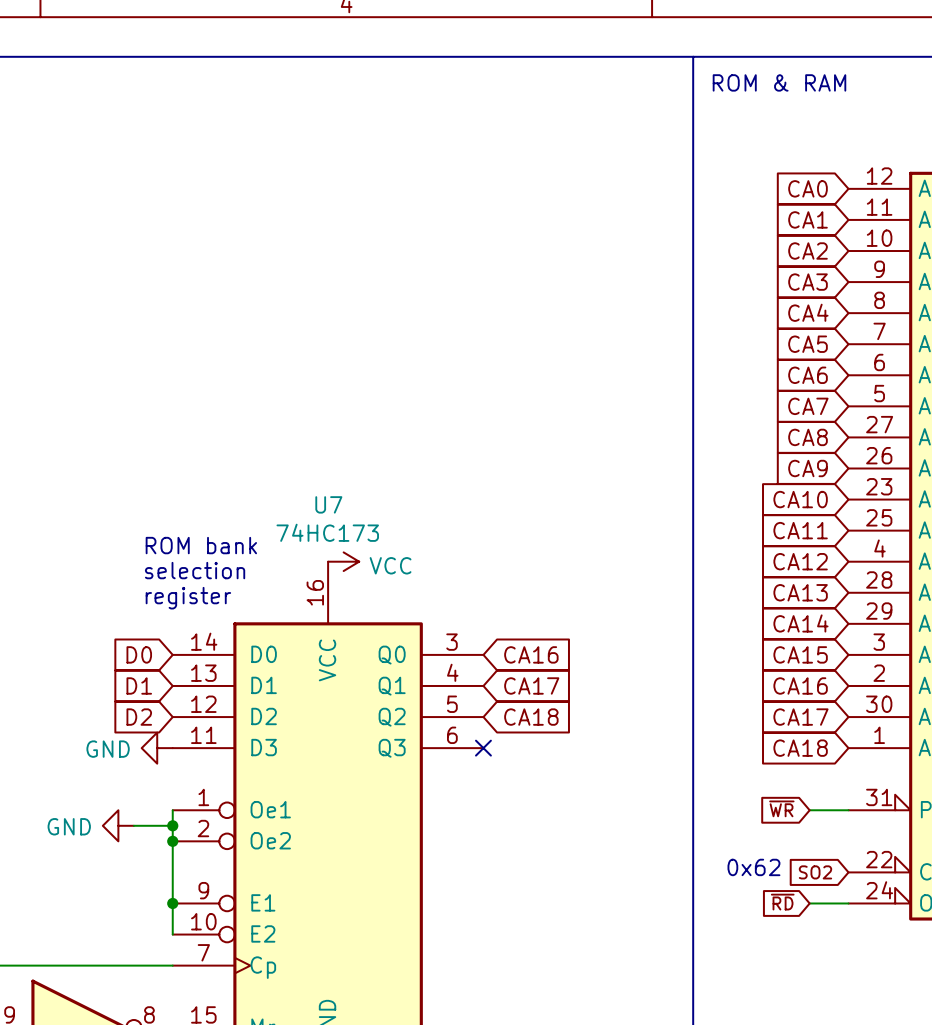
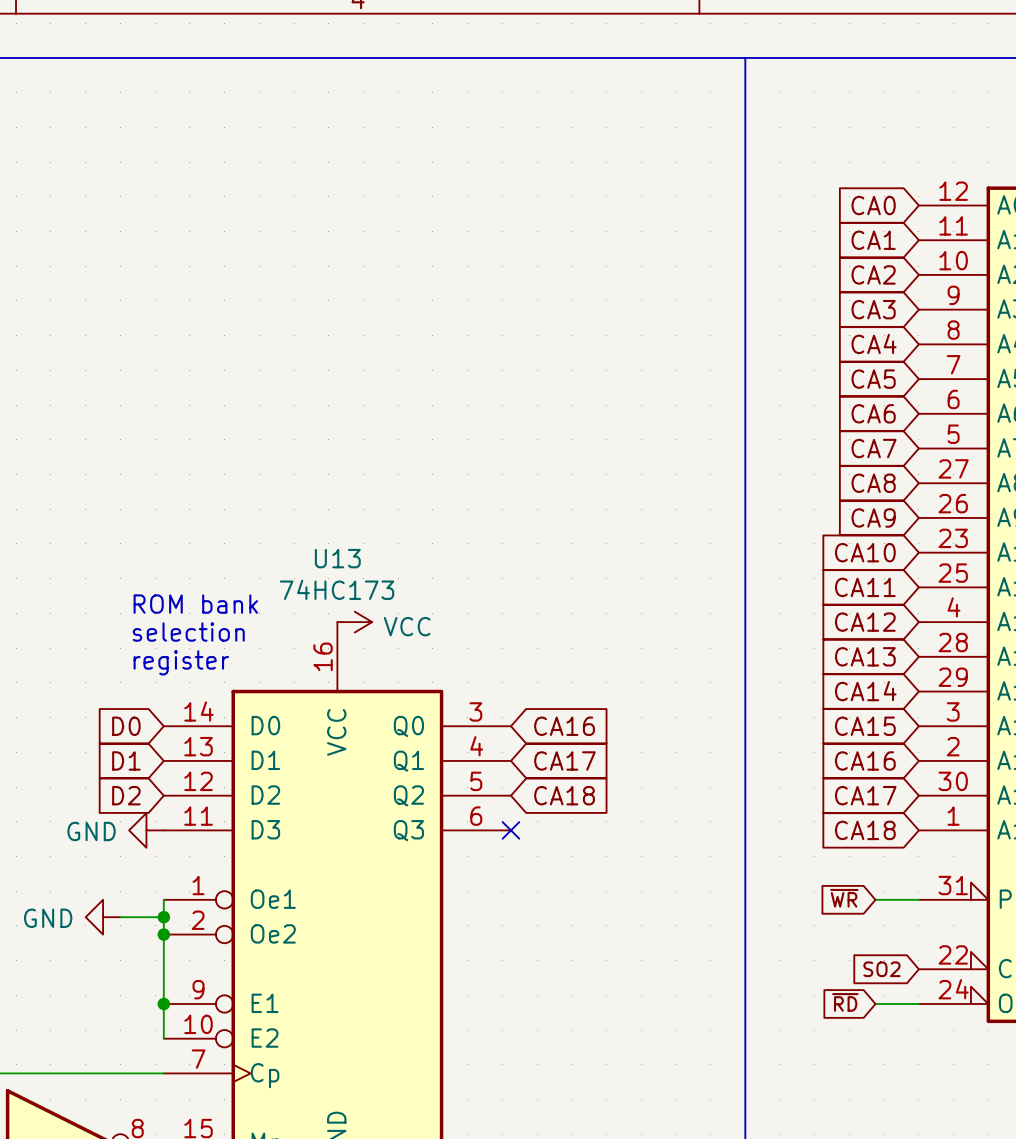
text: ROM & RAM (779, 82) -> none
U7 name: U7 (328, 504) -> U13 (337, 558)
text: 0x62 (753, 867) -> none

